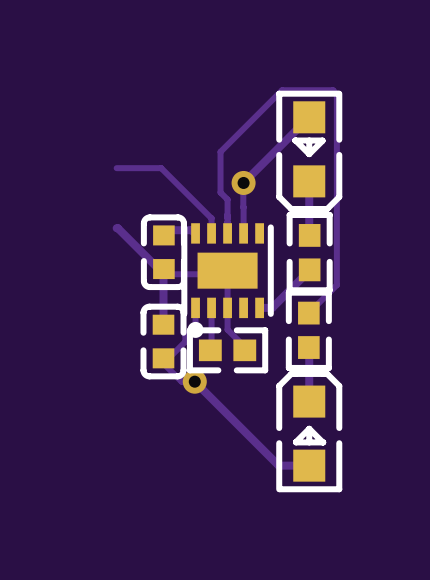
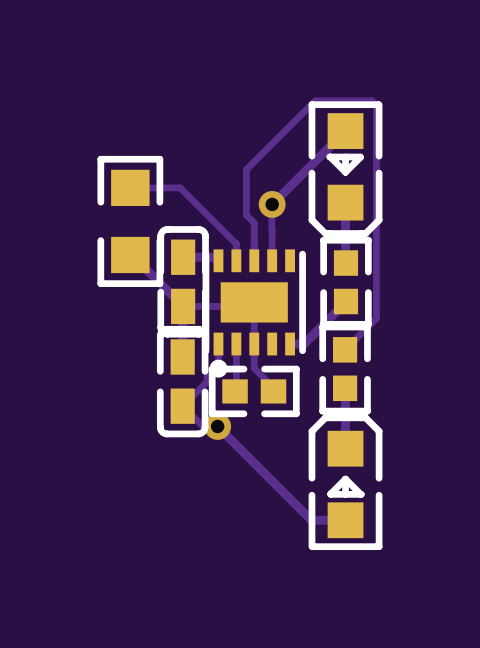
part: none -> (130, 221)
part footprint: [140, 214, 187, 291] -> [157, 226, 209, 338]
part footprint: [140, 303, 187, 380] -> [156, 325, 209, 438]

